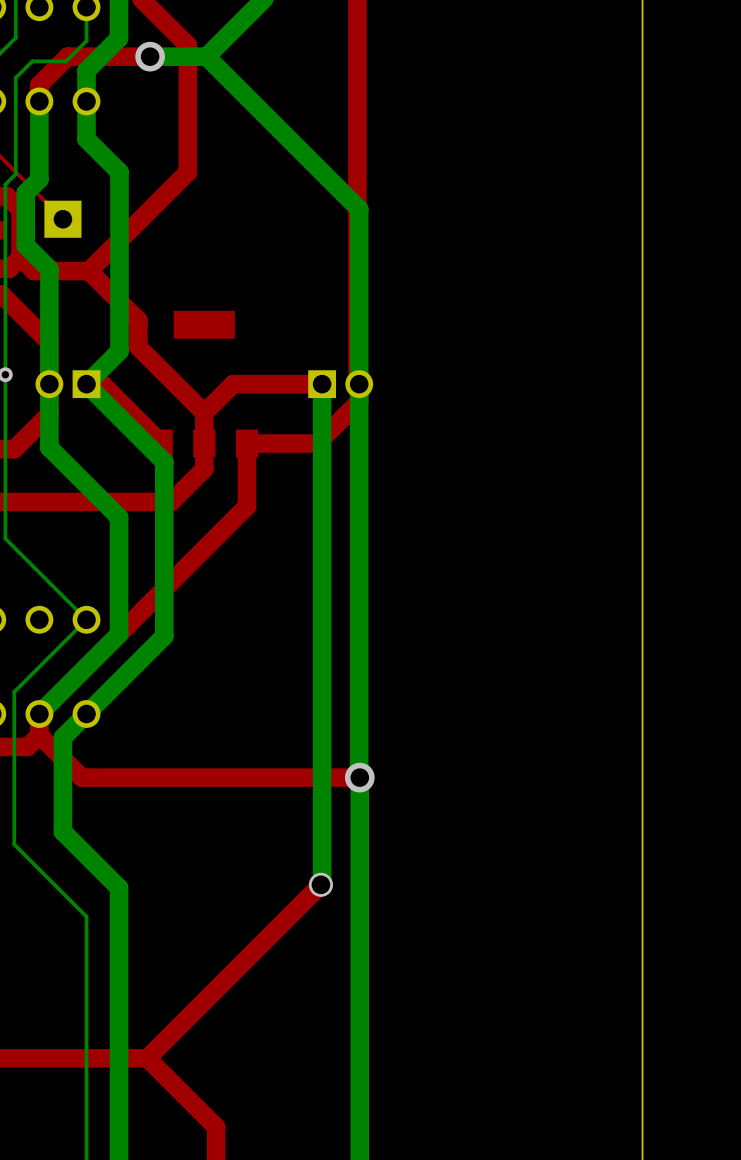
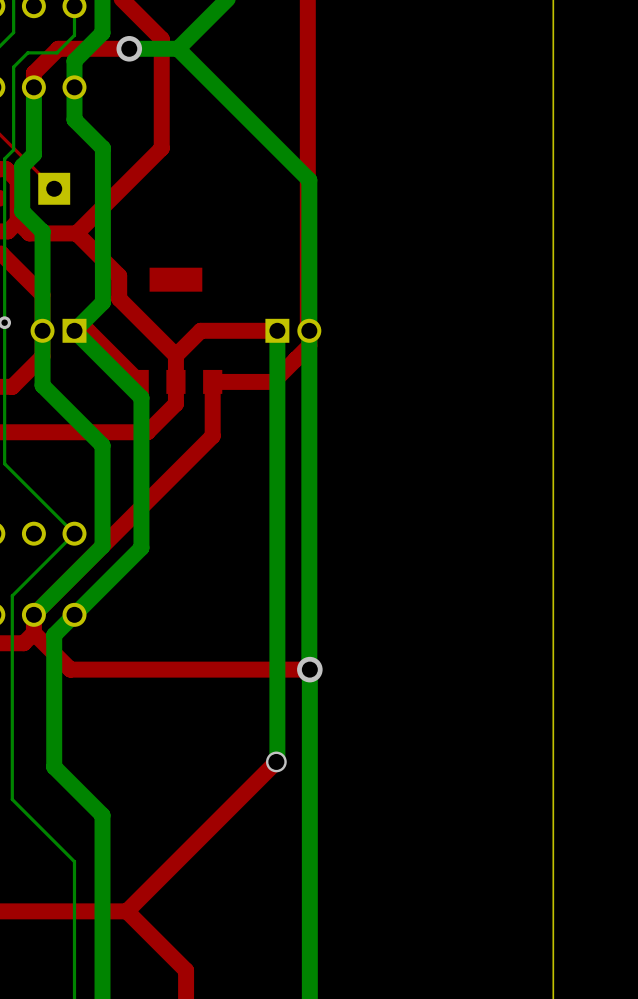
bottom track: (62, 831) (119, 887) (119, 946) -> (54, 716) (54, 767) (102, 815)
bottom track: (14, 844) (86, 916) (86, 1000) -> (12, 727) (12, 799) (74, 861)

